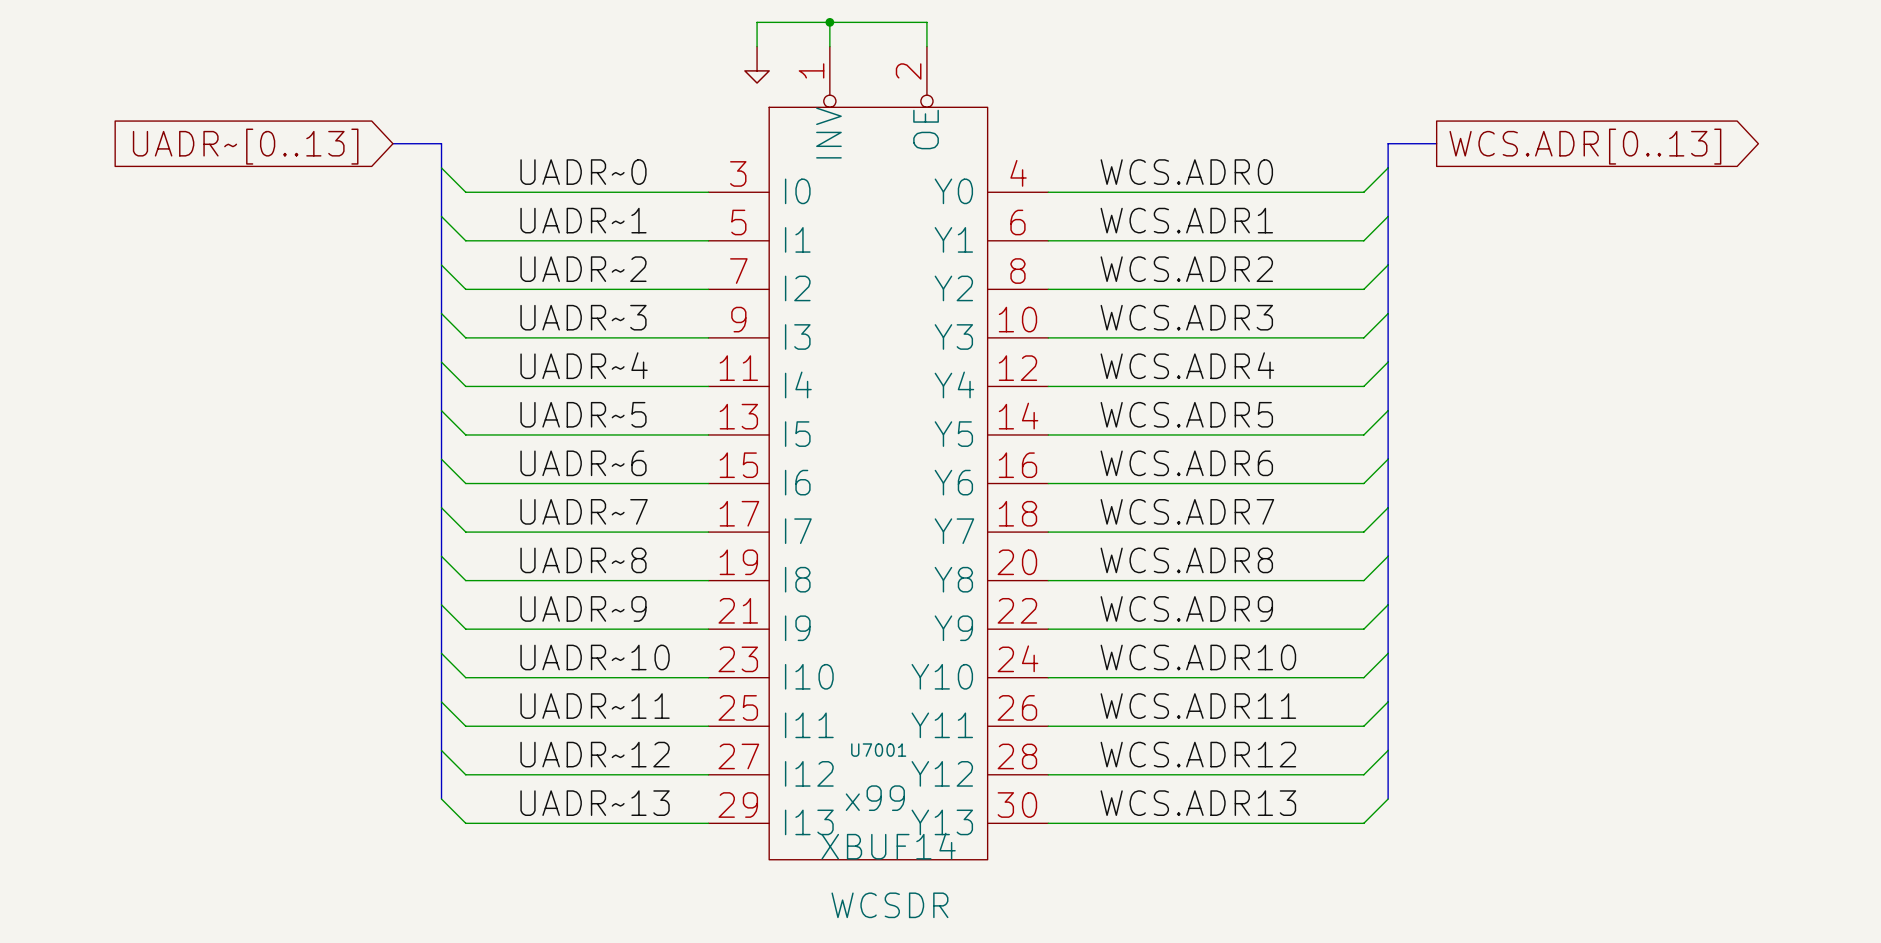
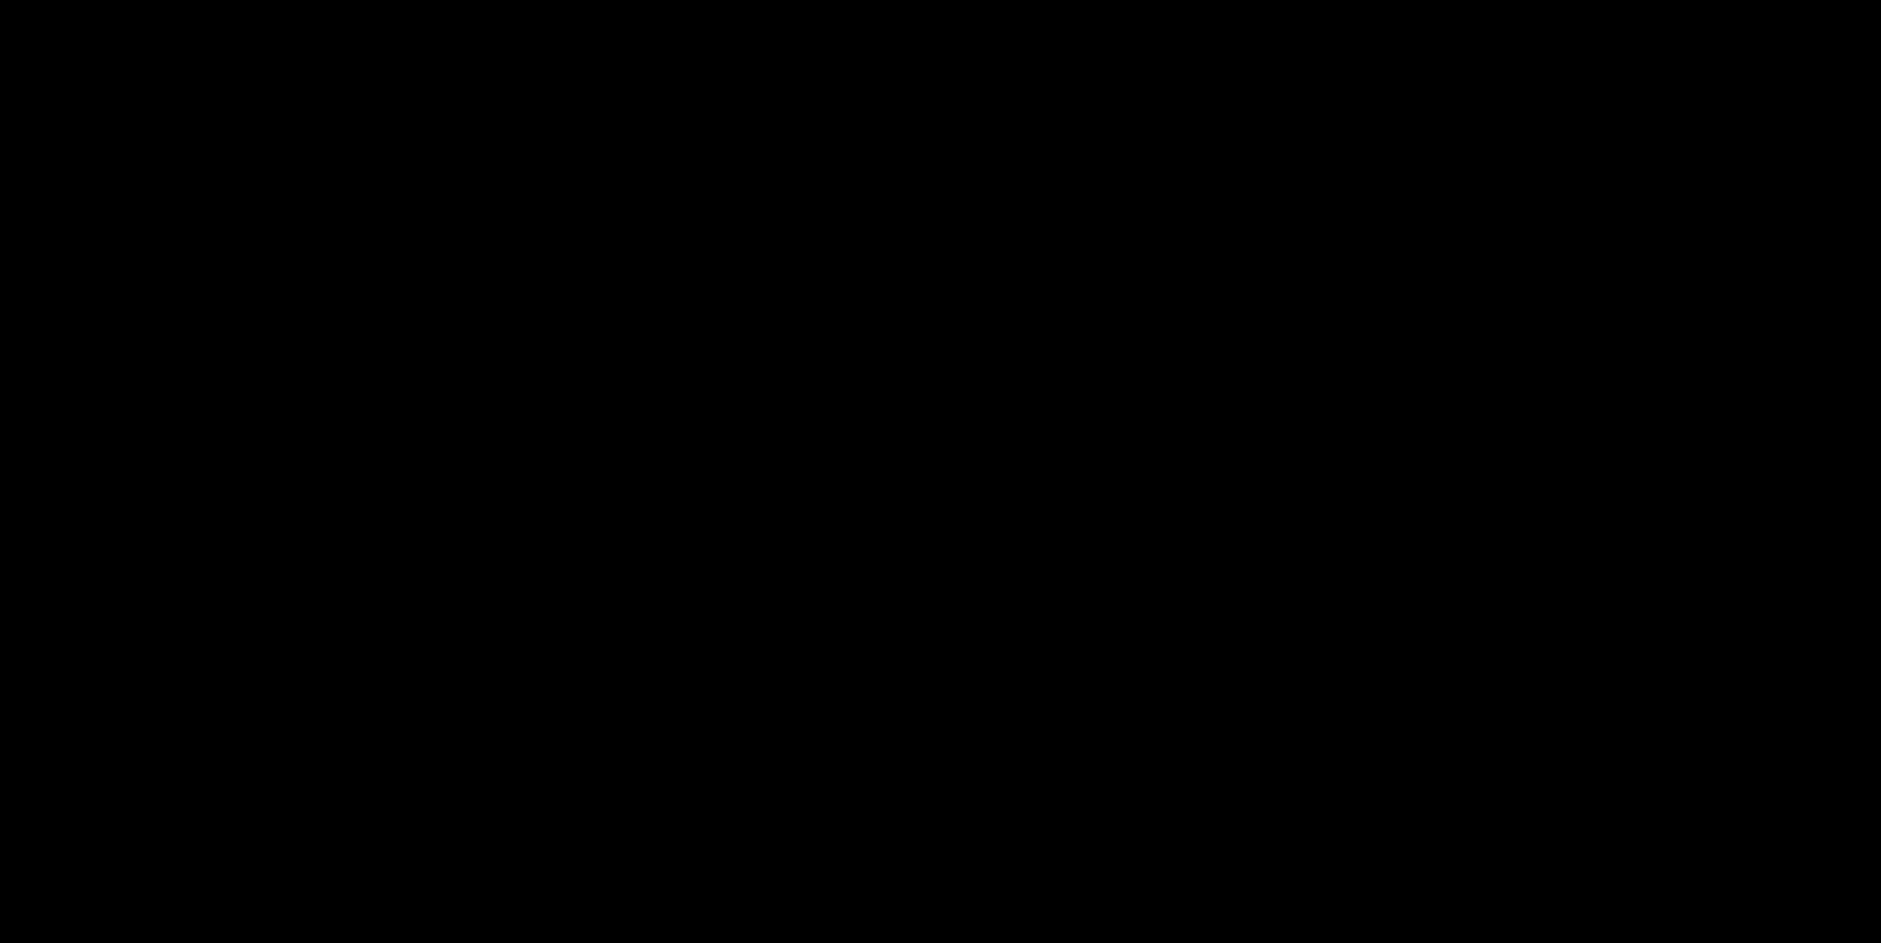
wire: (829, 22) (829, 46) -> none
junction: (829, 22) -> none
wire: (757, 46) (757, 22) (926, 22) (926, 46) -> none
power symbol: (757, 65) -> none
bus: (392, 143) (441, 143) (441, 799) -> none
bus: (1436, 143) (1388, 143) (1388, 799) -> none
global label: UADR~[0..13] (245, 146) -> none
global label: WCS.ADR[0..13] (1585, 146) -> none
wire: (441, 167) (465, 192) (708, 192) -> none
wire: (1388, 167) (1363, 192) (1048, 192) -> none
label: UADR~0 (583, 172) -> none
label: WCS.ADR0 (1186, 172) -> none
wire: (441, 216) (465, 240) (708, 240) -> none
wire: (1388, 216) (1363, 240) (1048, 240) -> none
label: UADR~1 (583, 220) -> none
label: WCS.ADR1 (1186, 220) -> none
wire: (441, 265) (465, 289) (708, 289) -> none
wire: (1388, 265) (1363, 289) (1048, 289) -> none
label: UADR~2 (583, 269) -> none
label: WCS.ADR2 (1186, 269) -> none
wire: (441, 313) (465, 337) (708, 337) -> none
wire: (1388, 313) (1363, 337) (1048, 337) -> none
label: UADR~3 (583, 317) -> none
label: WCS.ADR3 (1186, 317) -> none
wire: (441, 362) (465, 386) (708, 386) -> none
wire: (1388, 362) (1363, 386) (1048, 386) -> none
label: UADR~4 (584, 365) -> none
label: WCS.ADR4 (1187, 365) -> none
wire: (441, 410) (465, 434) (708, 434) -> none
wire: (1388, 410) (1363, 434) (1048, 434) -> none
label: UADR~5 (583, 414) -> none
label: WCS.ADR5 (1186, 414) -> none
U7001: XBUF14 (878, 453) -> none
wire: (441, 459) (465, 483) (708, 483) -> none
wire: (1388, 459) (1363, 483) (1048, 483) -> none
label: UADR~6 (583, 463) -> none
label: WCS.ADR6 (1186, 463) -> none
wire: (441, 507) (465, 532) (708, 532) -> none
wire: (1388, 507) (1363, 532) (1048, 532) -> none
label: UADR~7 (584, 511) -> none
label: WCS.ADR7 (1187, 511) -> none
wire: (441, 556) (465, 580) (708, 580) -> none
wire: (1388, 556) (1363, 580) (1048, 580) -> none
label: UADR~8 (583, 560) -> none
label: WCS.ADR8 (1186, 560) -> none
wire: (441, 604) (465, 629) (708, 629) -> none
wire: (1388, 604) (1363, 629) (1048, 629) -> none
label: UADR~9 (583, 608) -> none
label: WCS.ADR9 (1186, 608) -> none
wire: (441, 653) (465, 677) (708, 677) -> none
wire: (1388, 653) (1363, 677) (1048, 677) -> none
label: UADR~10 (595, 657) -> none
label: WCS.ADR10 (1198, 657) -> none
wire: (441, 701) (465, 726) (708, 726) -> none
wire: (1388, 701) (1363, 726) (1048, 726) -> none
label: UADR~11 (595, 706) -> none
label: WCS.ADR11 (1198, 706) -> none
wire: (441, 750) (465, 774) (708, 774) -> none
wire: (1388, 750) (1363, 774) (1048, 774) -> none
label: UADR~12 (595, 754) -> none
label: WCS.ADR12 (1198, 754) -> none
wire: (441, 799) (465, 823) (708, 823) -> none
wire: (1388, 799) (1363, 823) (1048, 823) -> none
label: UADR~13 (595, 803) -> none
label: WCS.ADR13 (1198, 803) -> none

